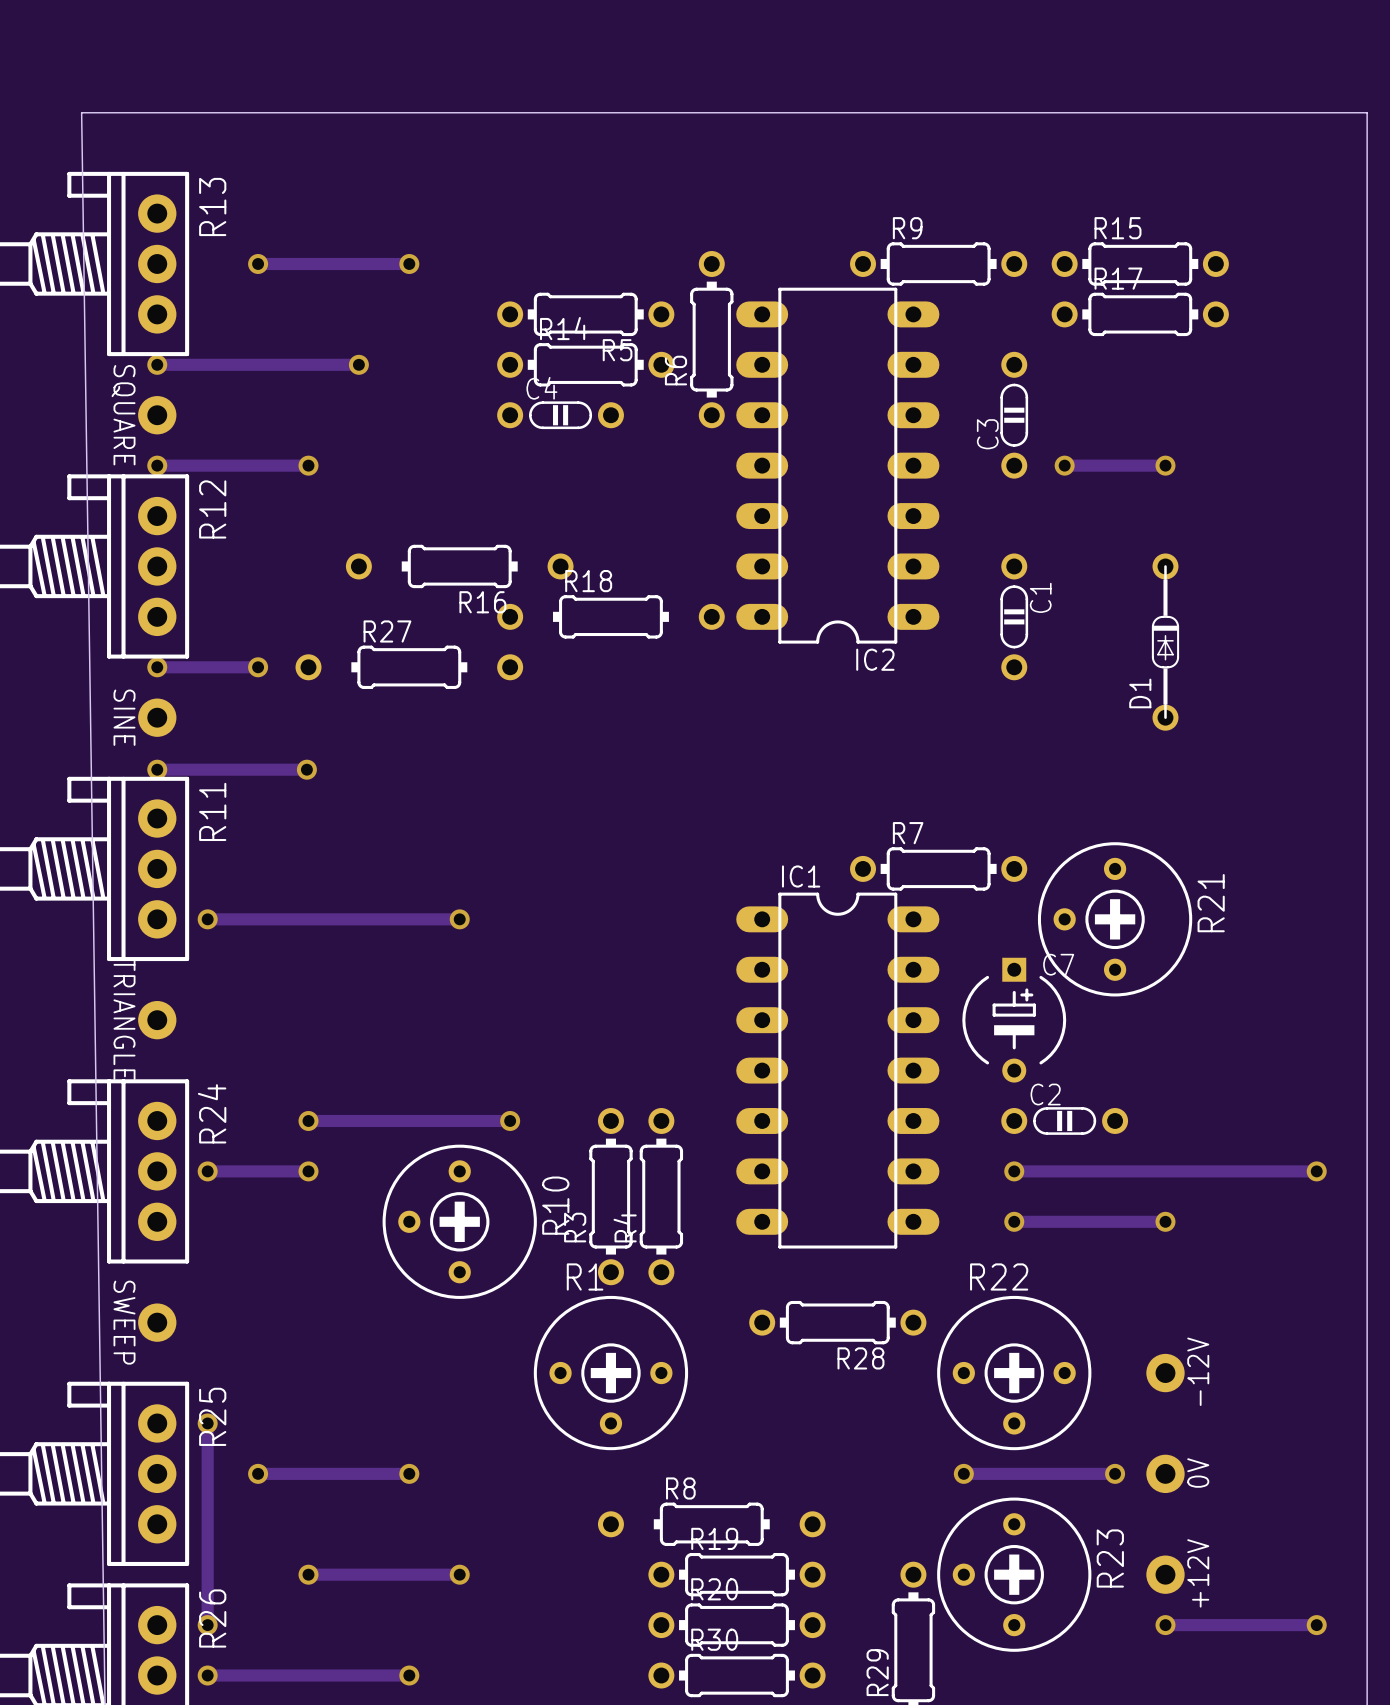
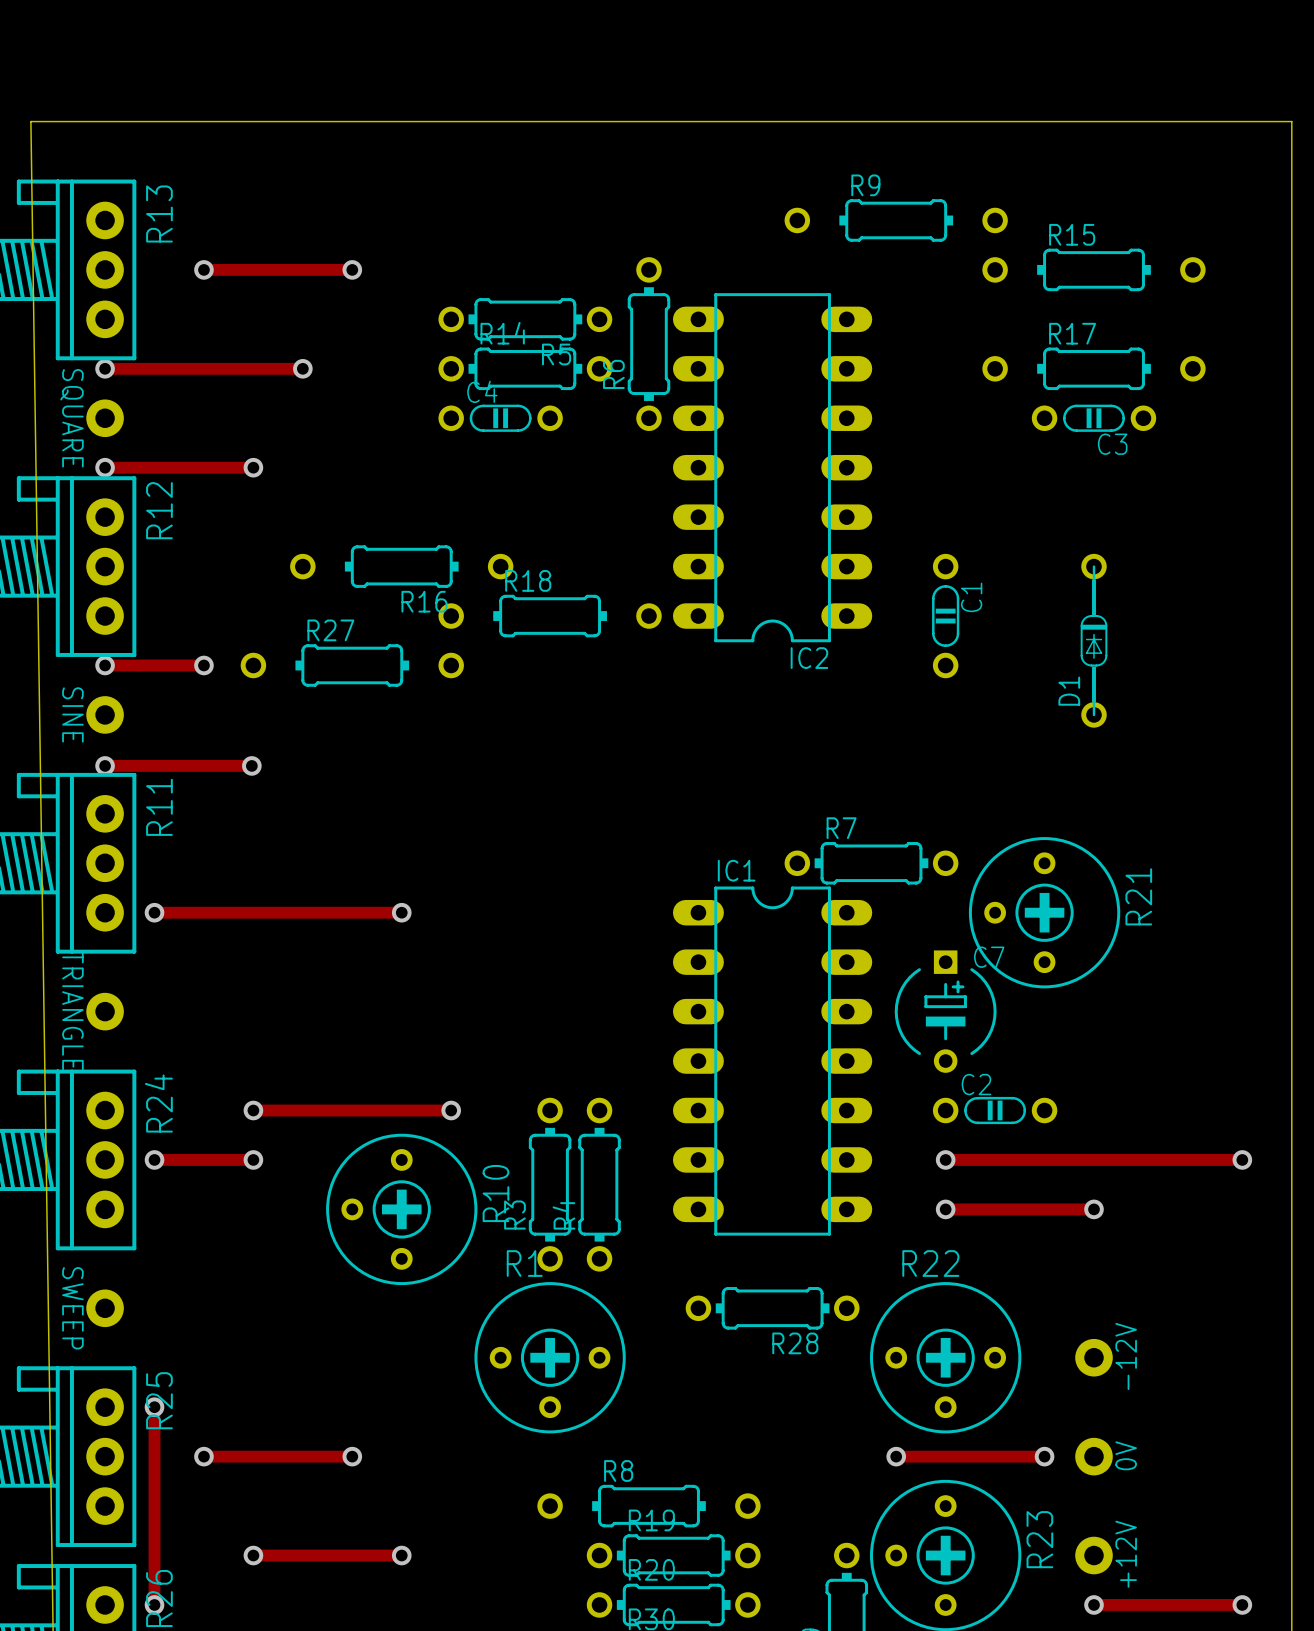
R9 footprint: [850, 242, 1028, 286] -> [784, 199, 1008, 242]
R15 footprint: [1051, 242, 1229, 286] -> [982, 248, 1206, 292]
R17 footprint: [1051, 292, 1229, 337] -> [982, 347, 1206, 391]
C3 rotation: 0° (1014, 415) -> 90° clockwise (1094, 418)
C3 position: (1014, 415) -> (1094, 418)
C3 name position: C3 (987, 434) -> C3 (1112, 444)
track: (1064, 465) (1165, 465) -> none
via: (1064, 465) -> none
via: (1165, 465) -> none

